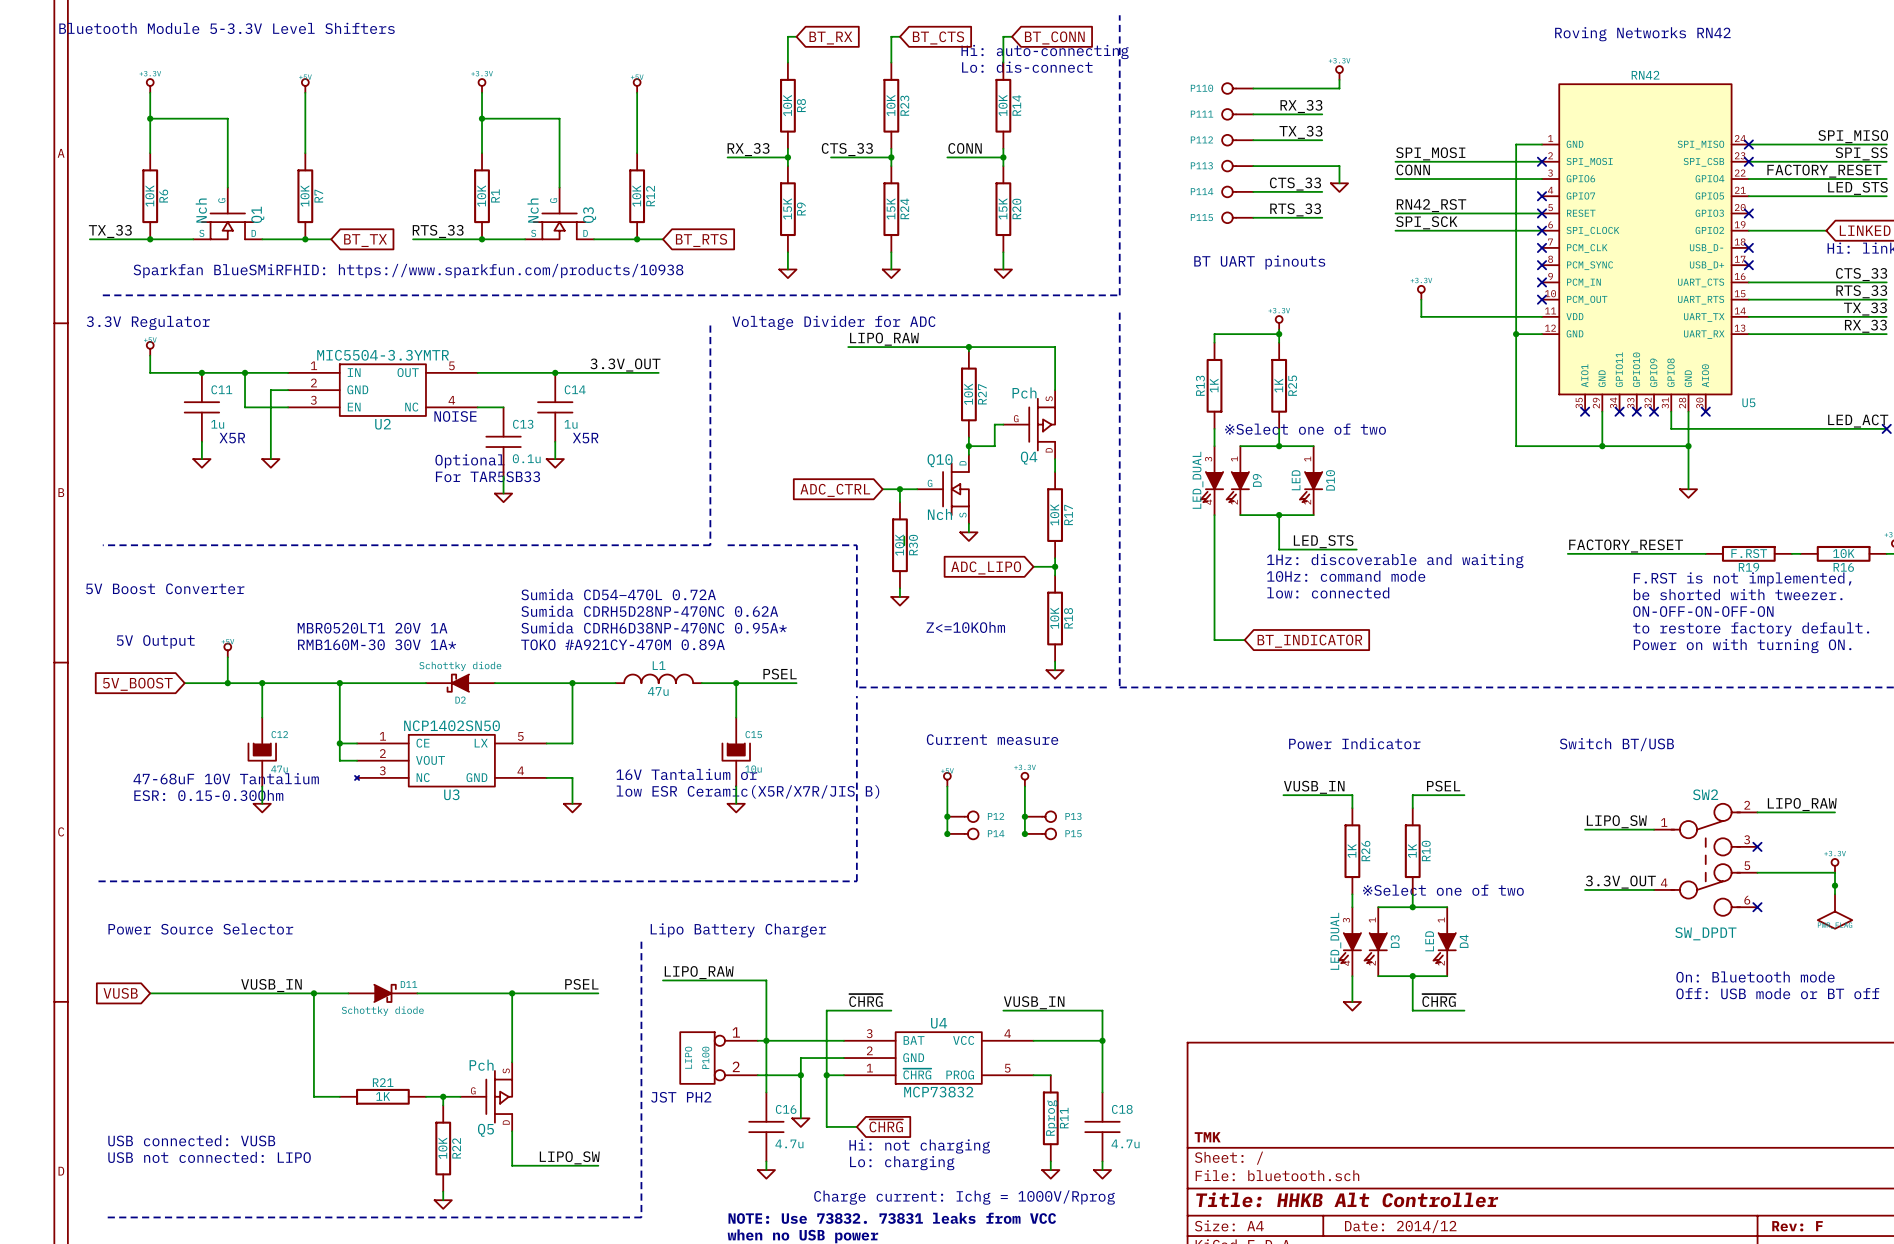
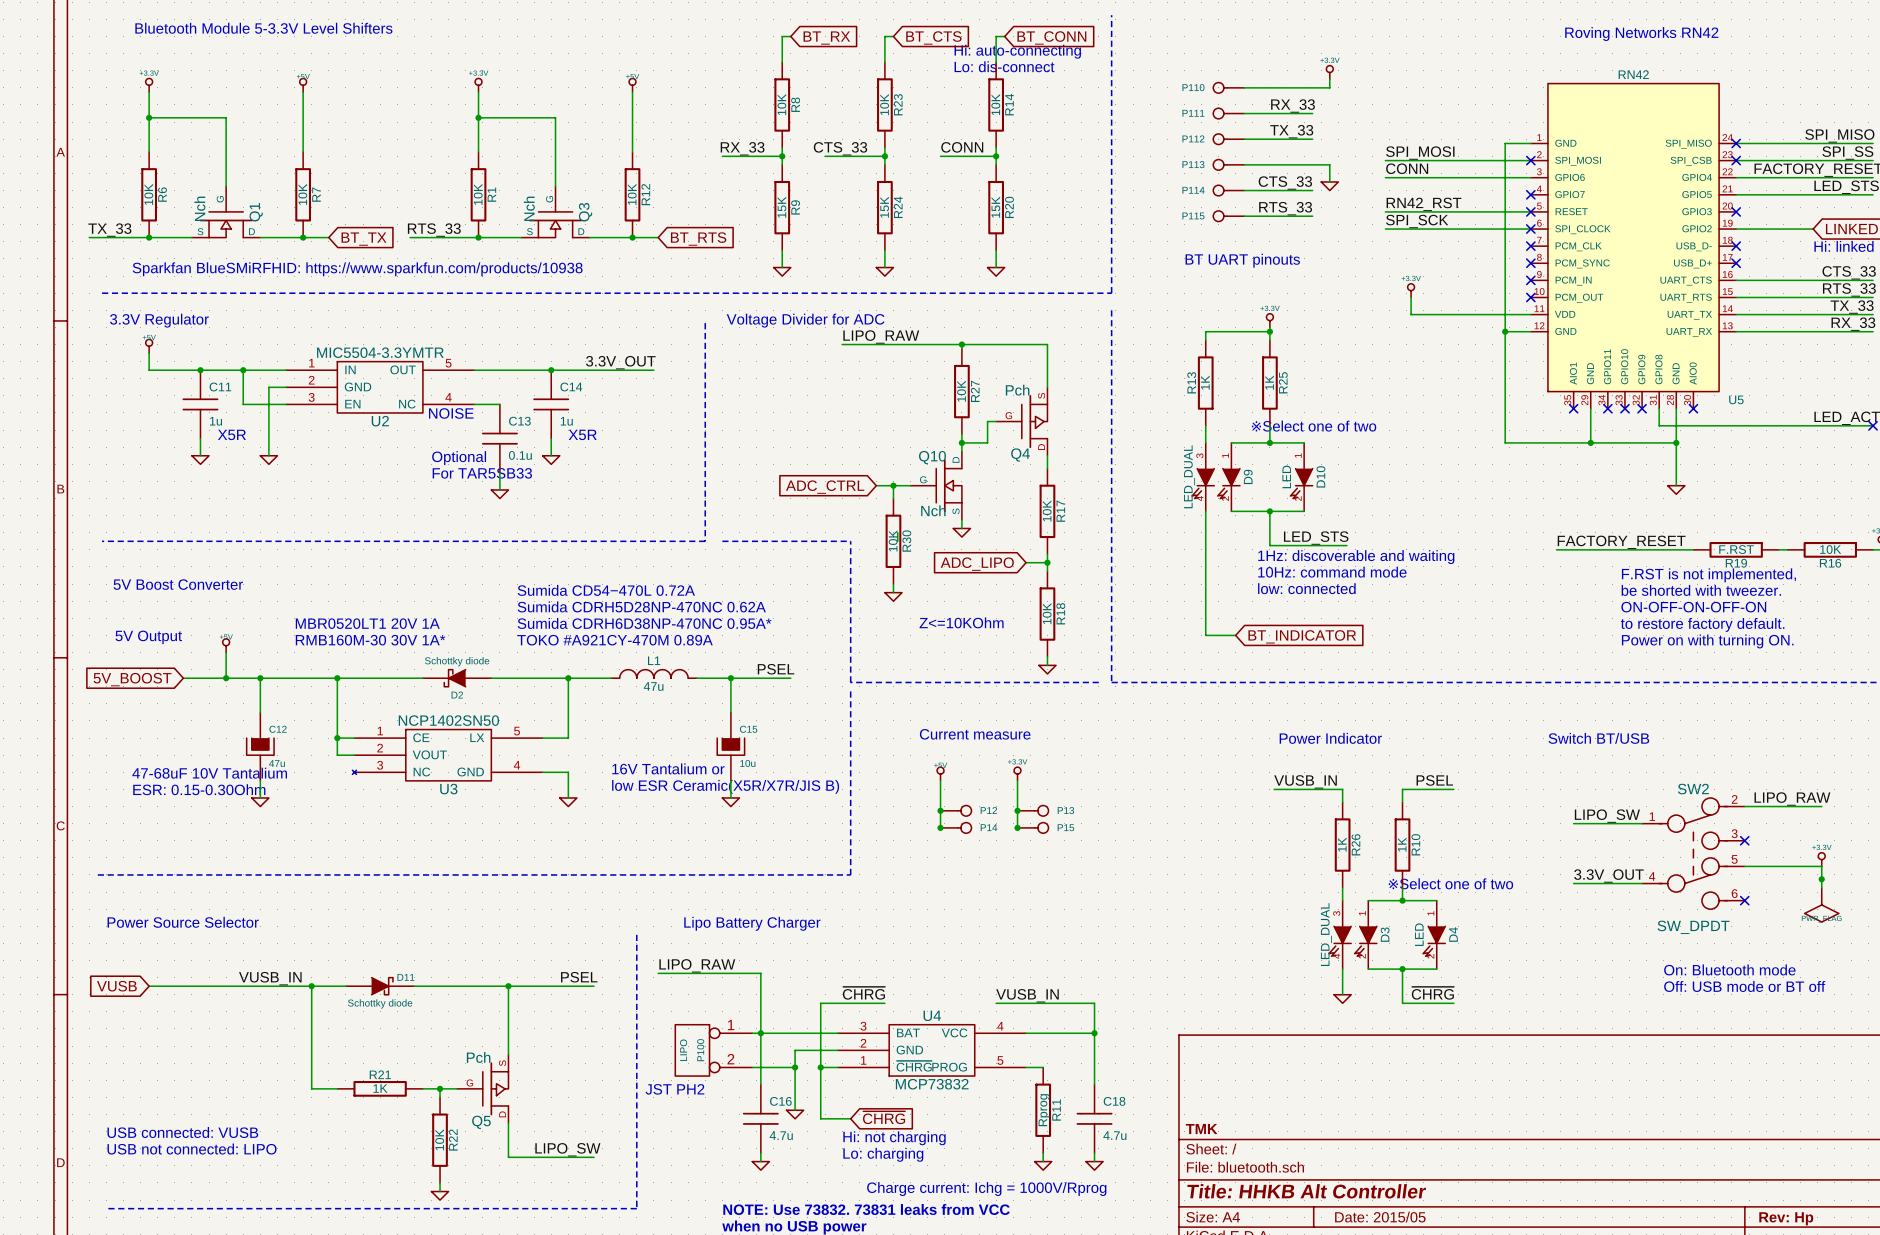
title block: Date: 2014/12 (1400, 1226) -> Date: 2015/05 (1380, 1217)
title block: Rev: F (1797, 1226) -> Rev: Hp (1786, 1218)

